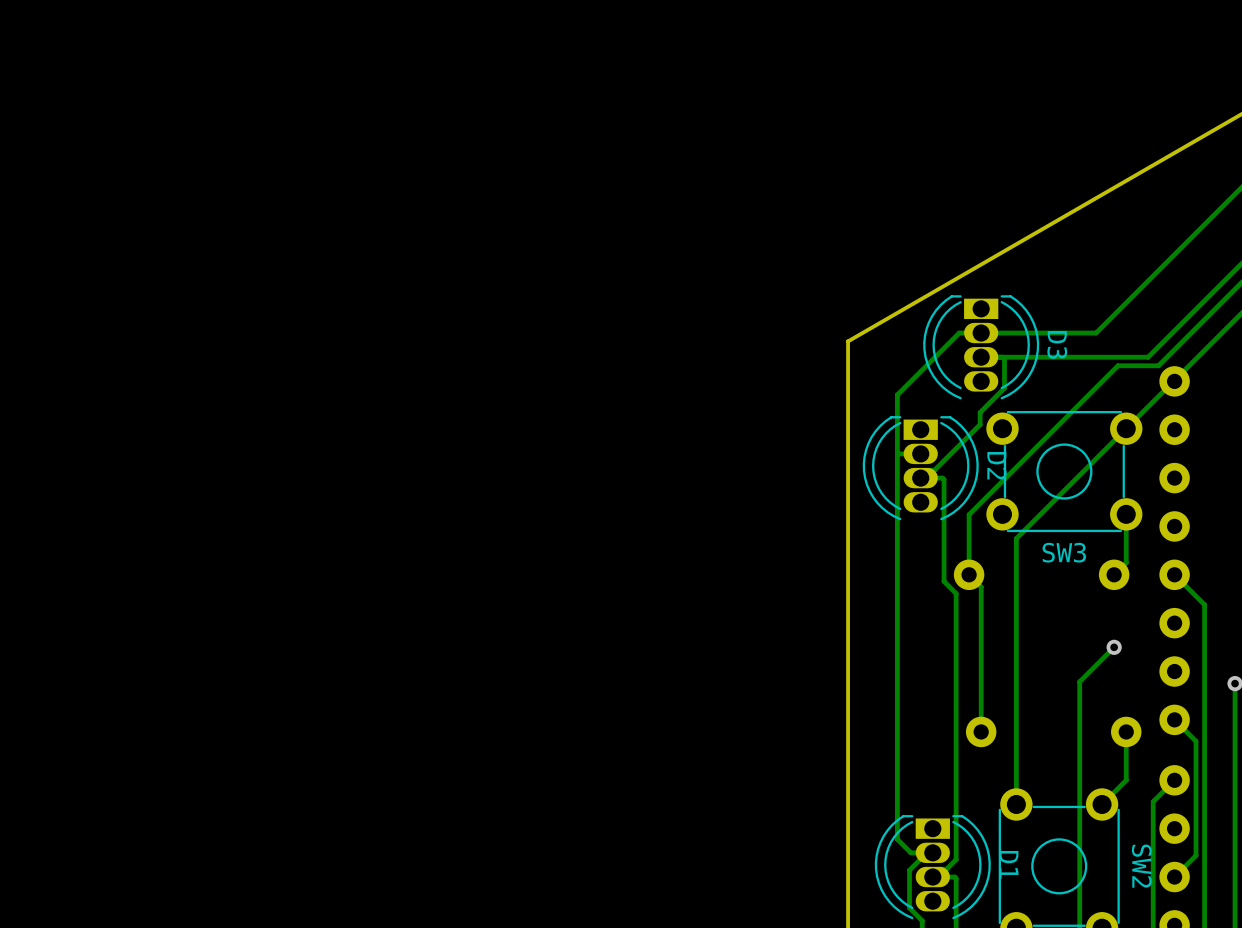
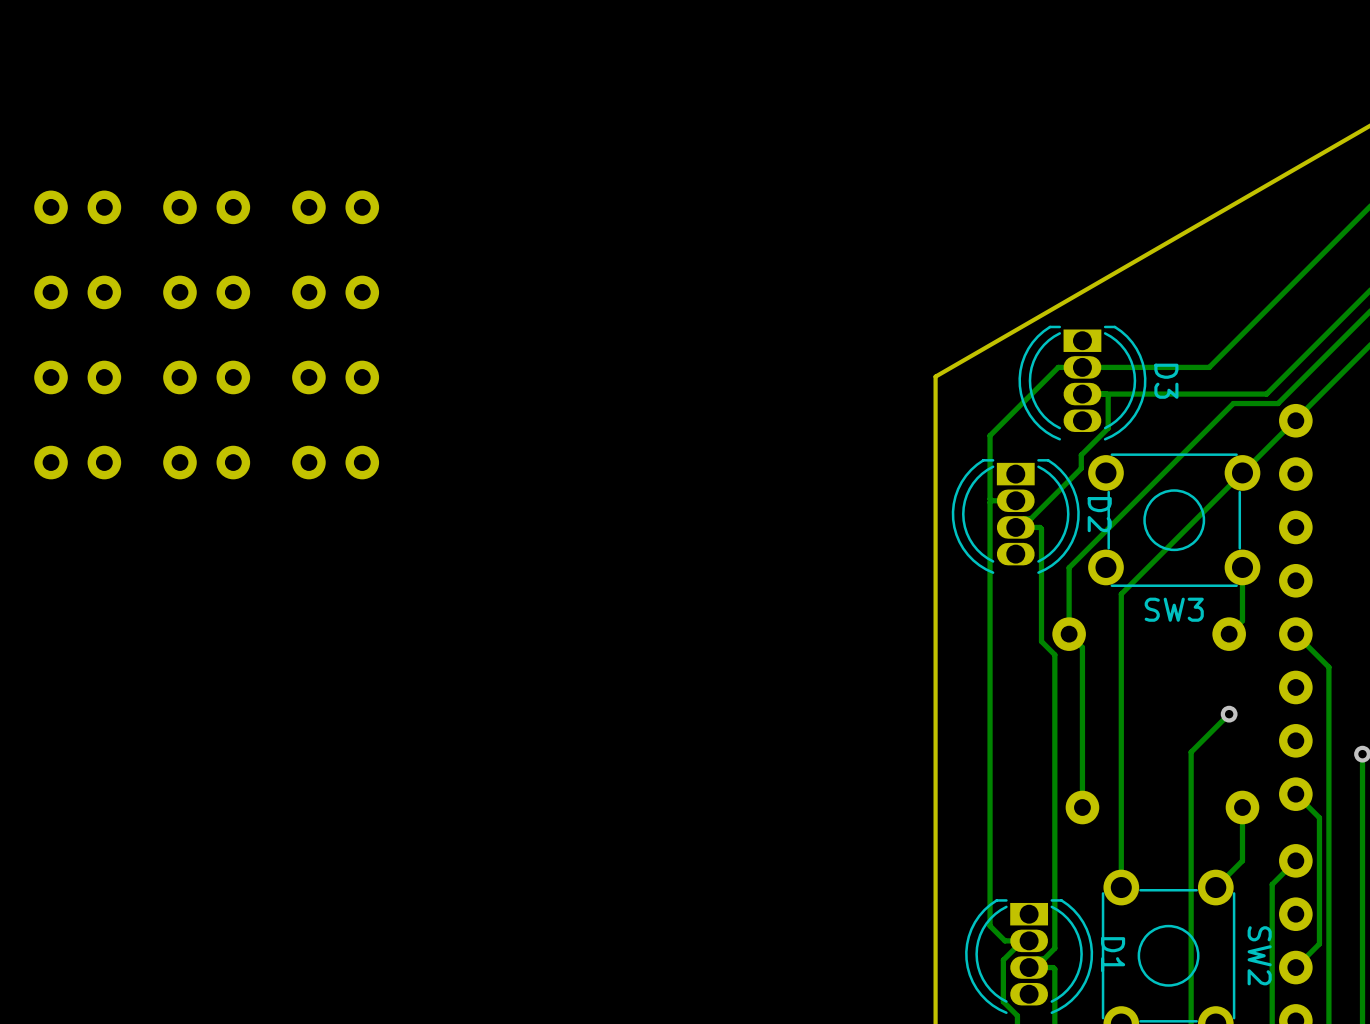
part: none -> (77, 207)
part: none -> (206, 207)
part: none -> (335, 207)
part: none -> (77, 292)
part: none -> (206, 292)
part: none -> (335, 292)
part: none -> (77, 377)
part: none -> (206, 377)
part: none -> (335, 377)
part: none -> (77, 462)
part: none -> (206, 462)
part: none -> (335, 462)

